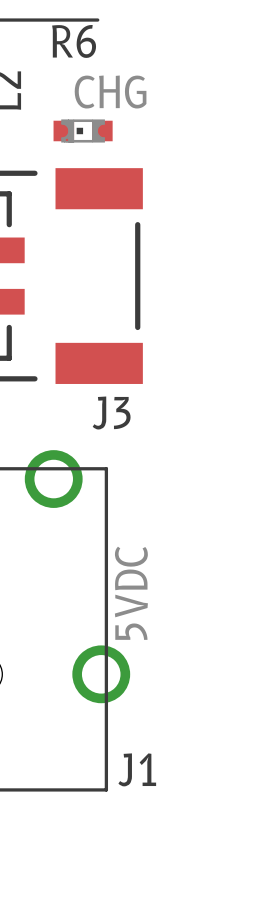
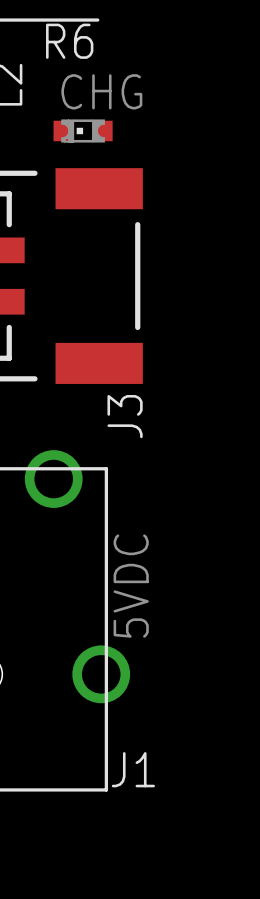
J3 name rotation: 0° (111, 413) -> 90° counterclockwise (125, 416)

